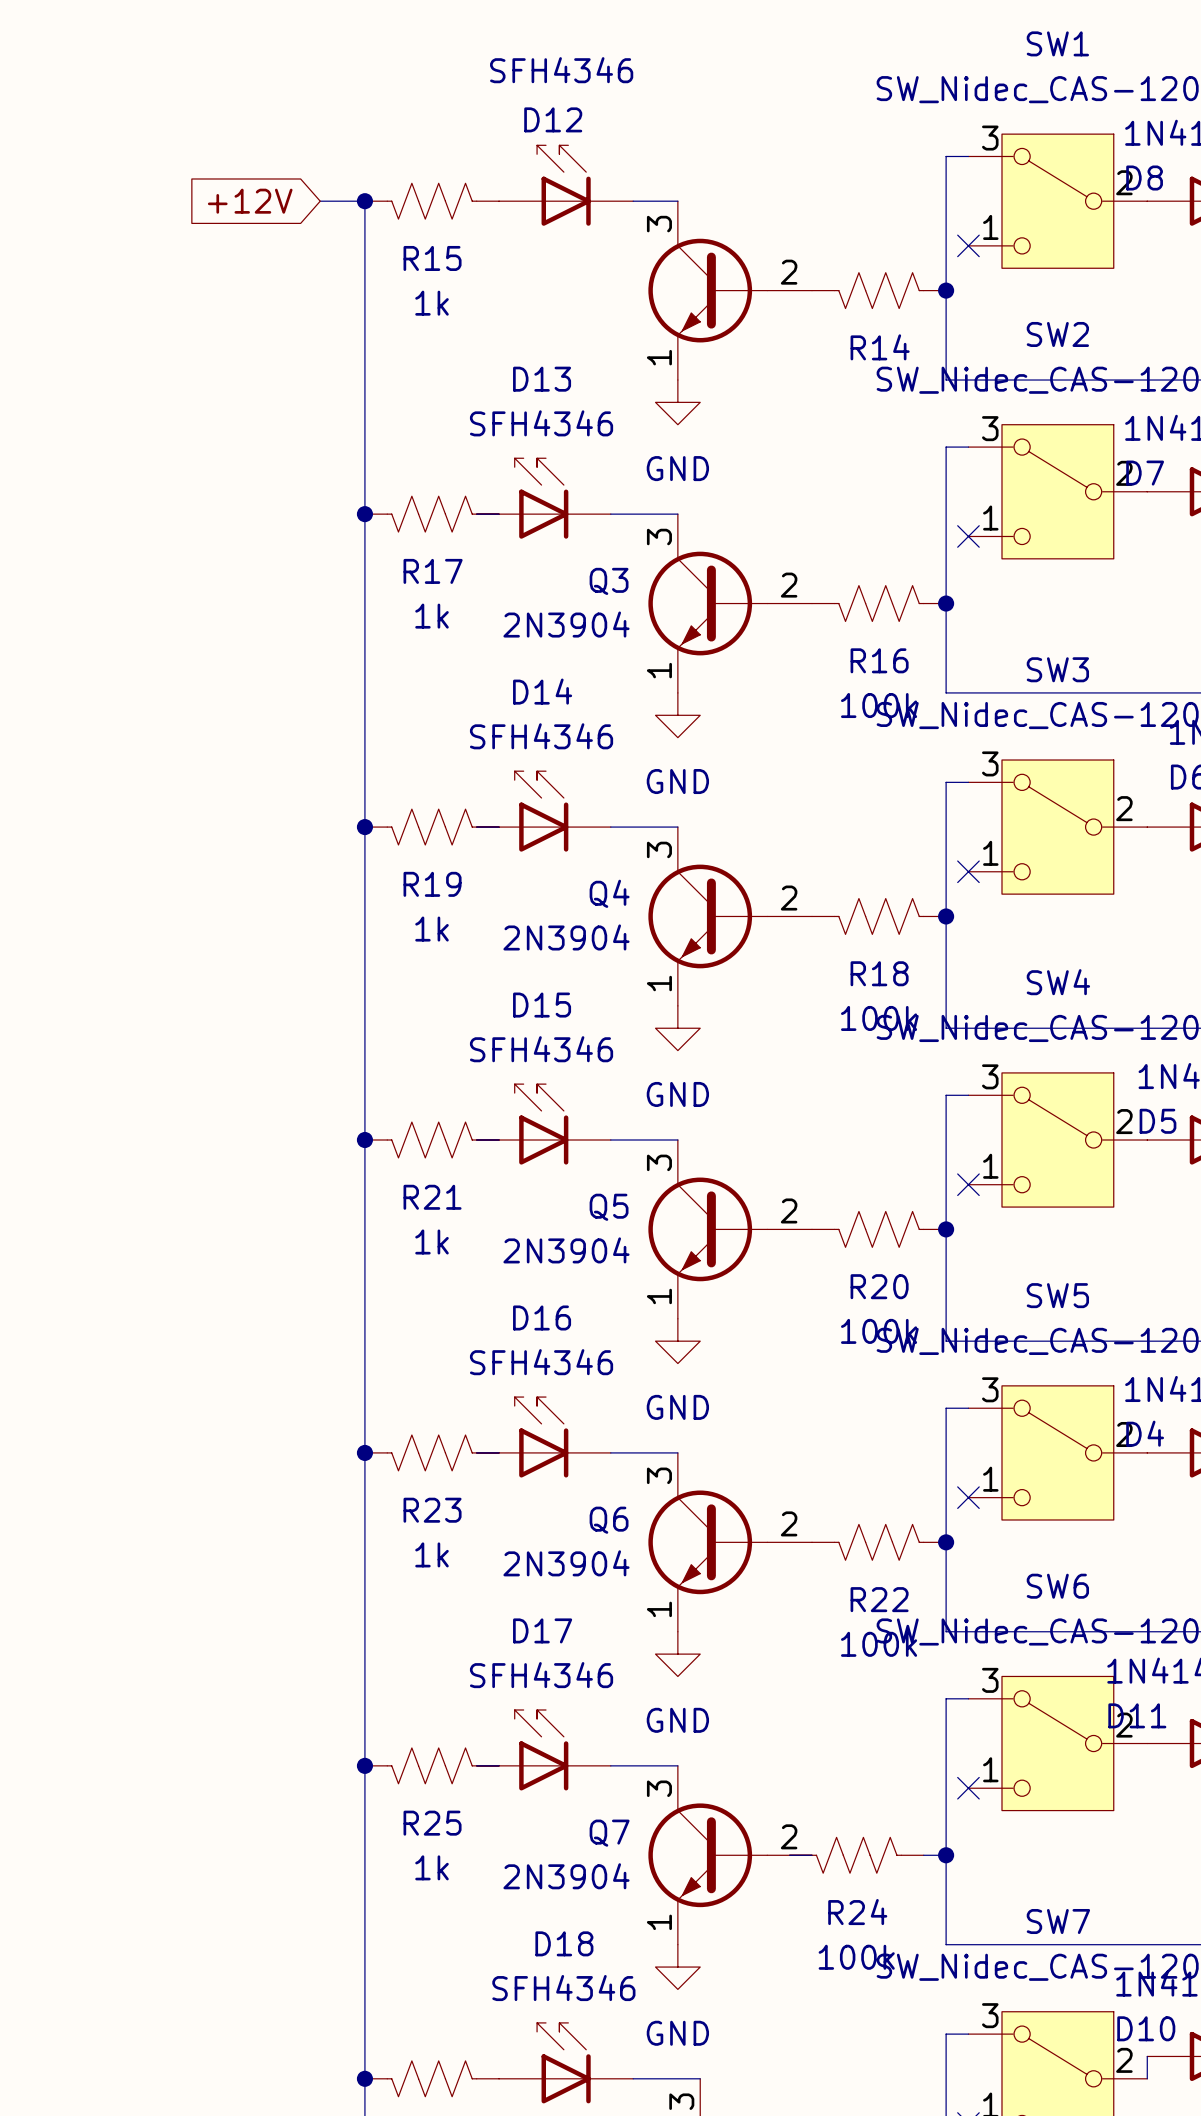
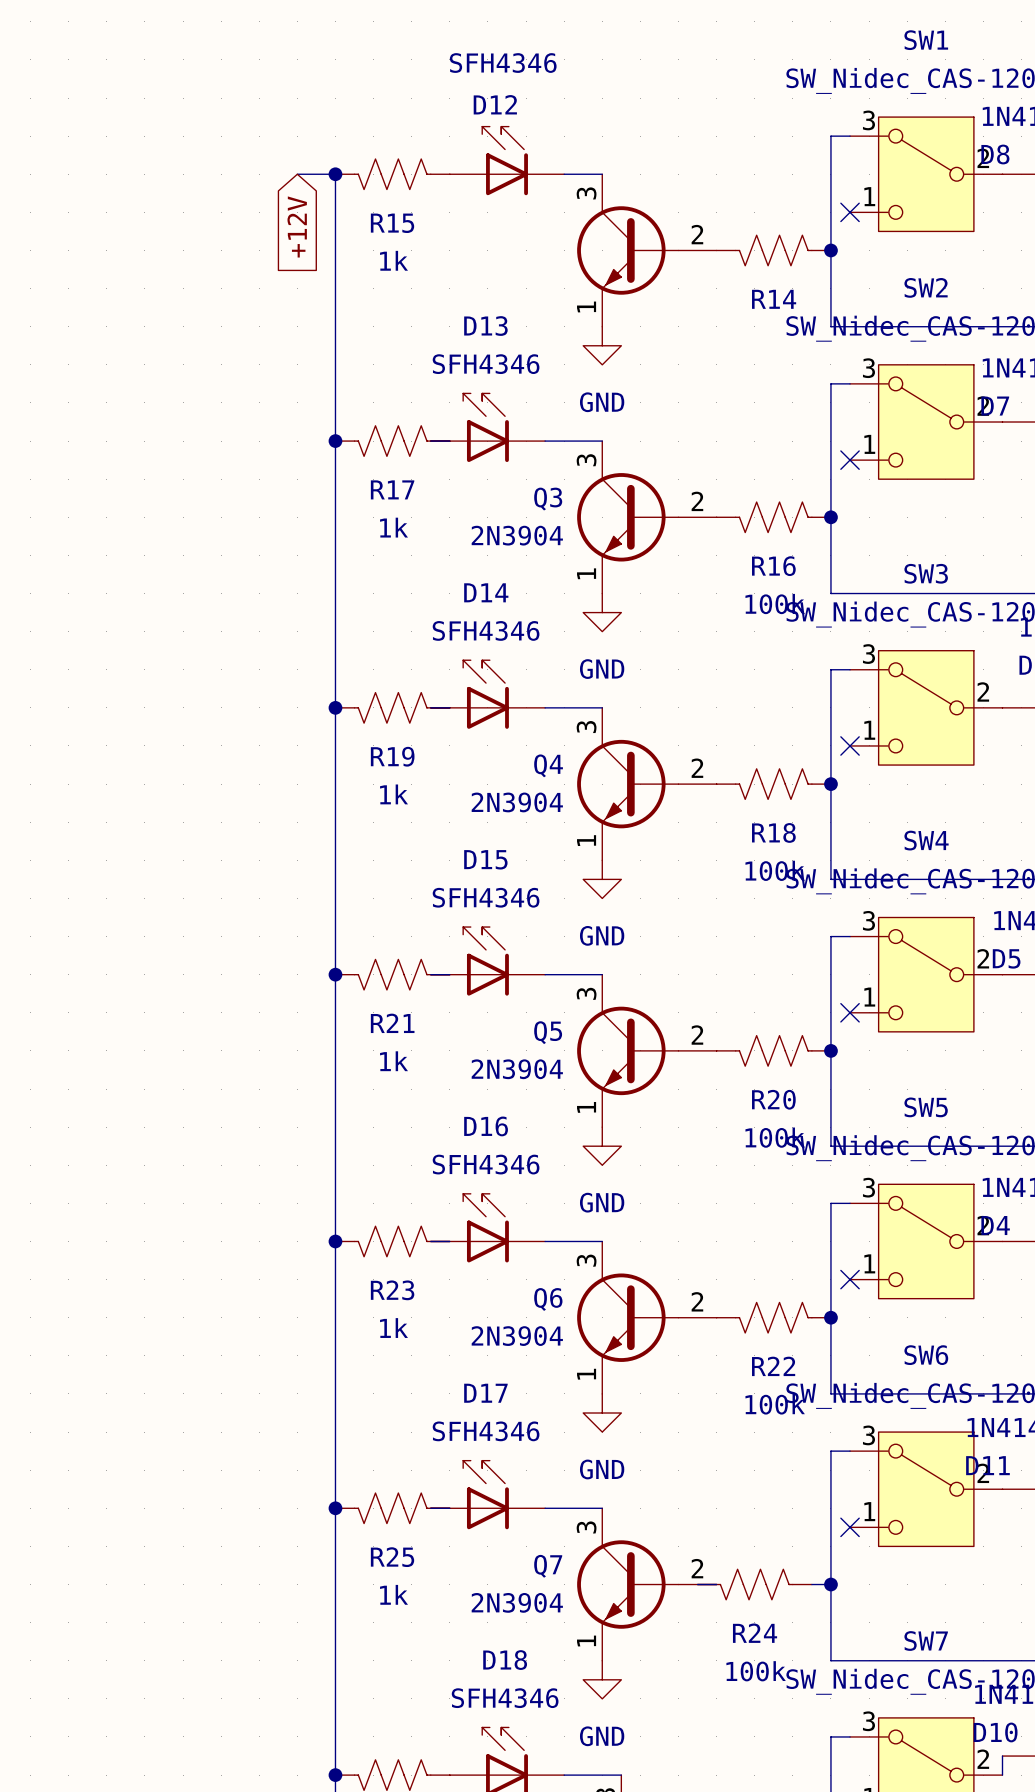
global label rotation: 0° (250, 201) -> 90° counterclockwise (297, 226)

